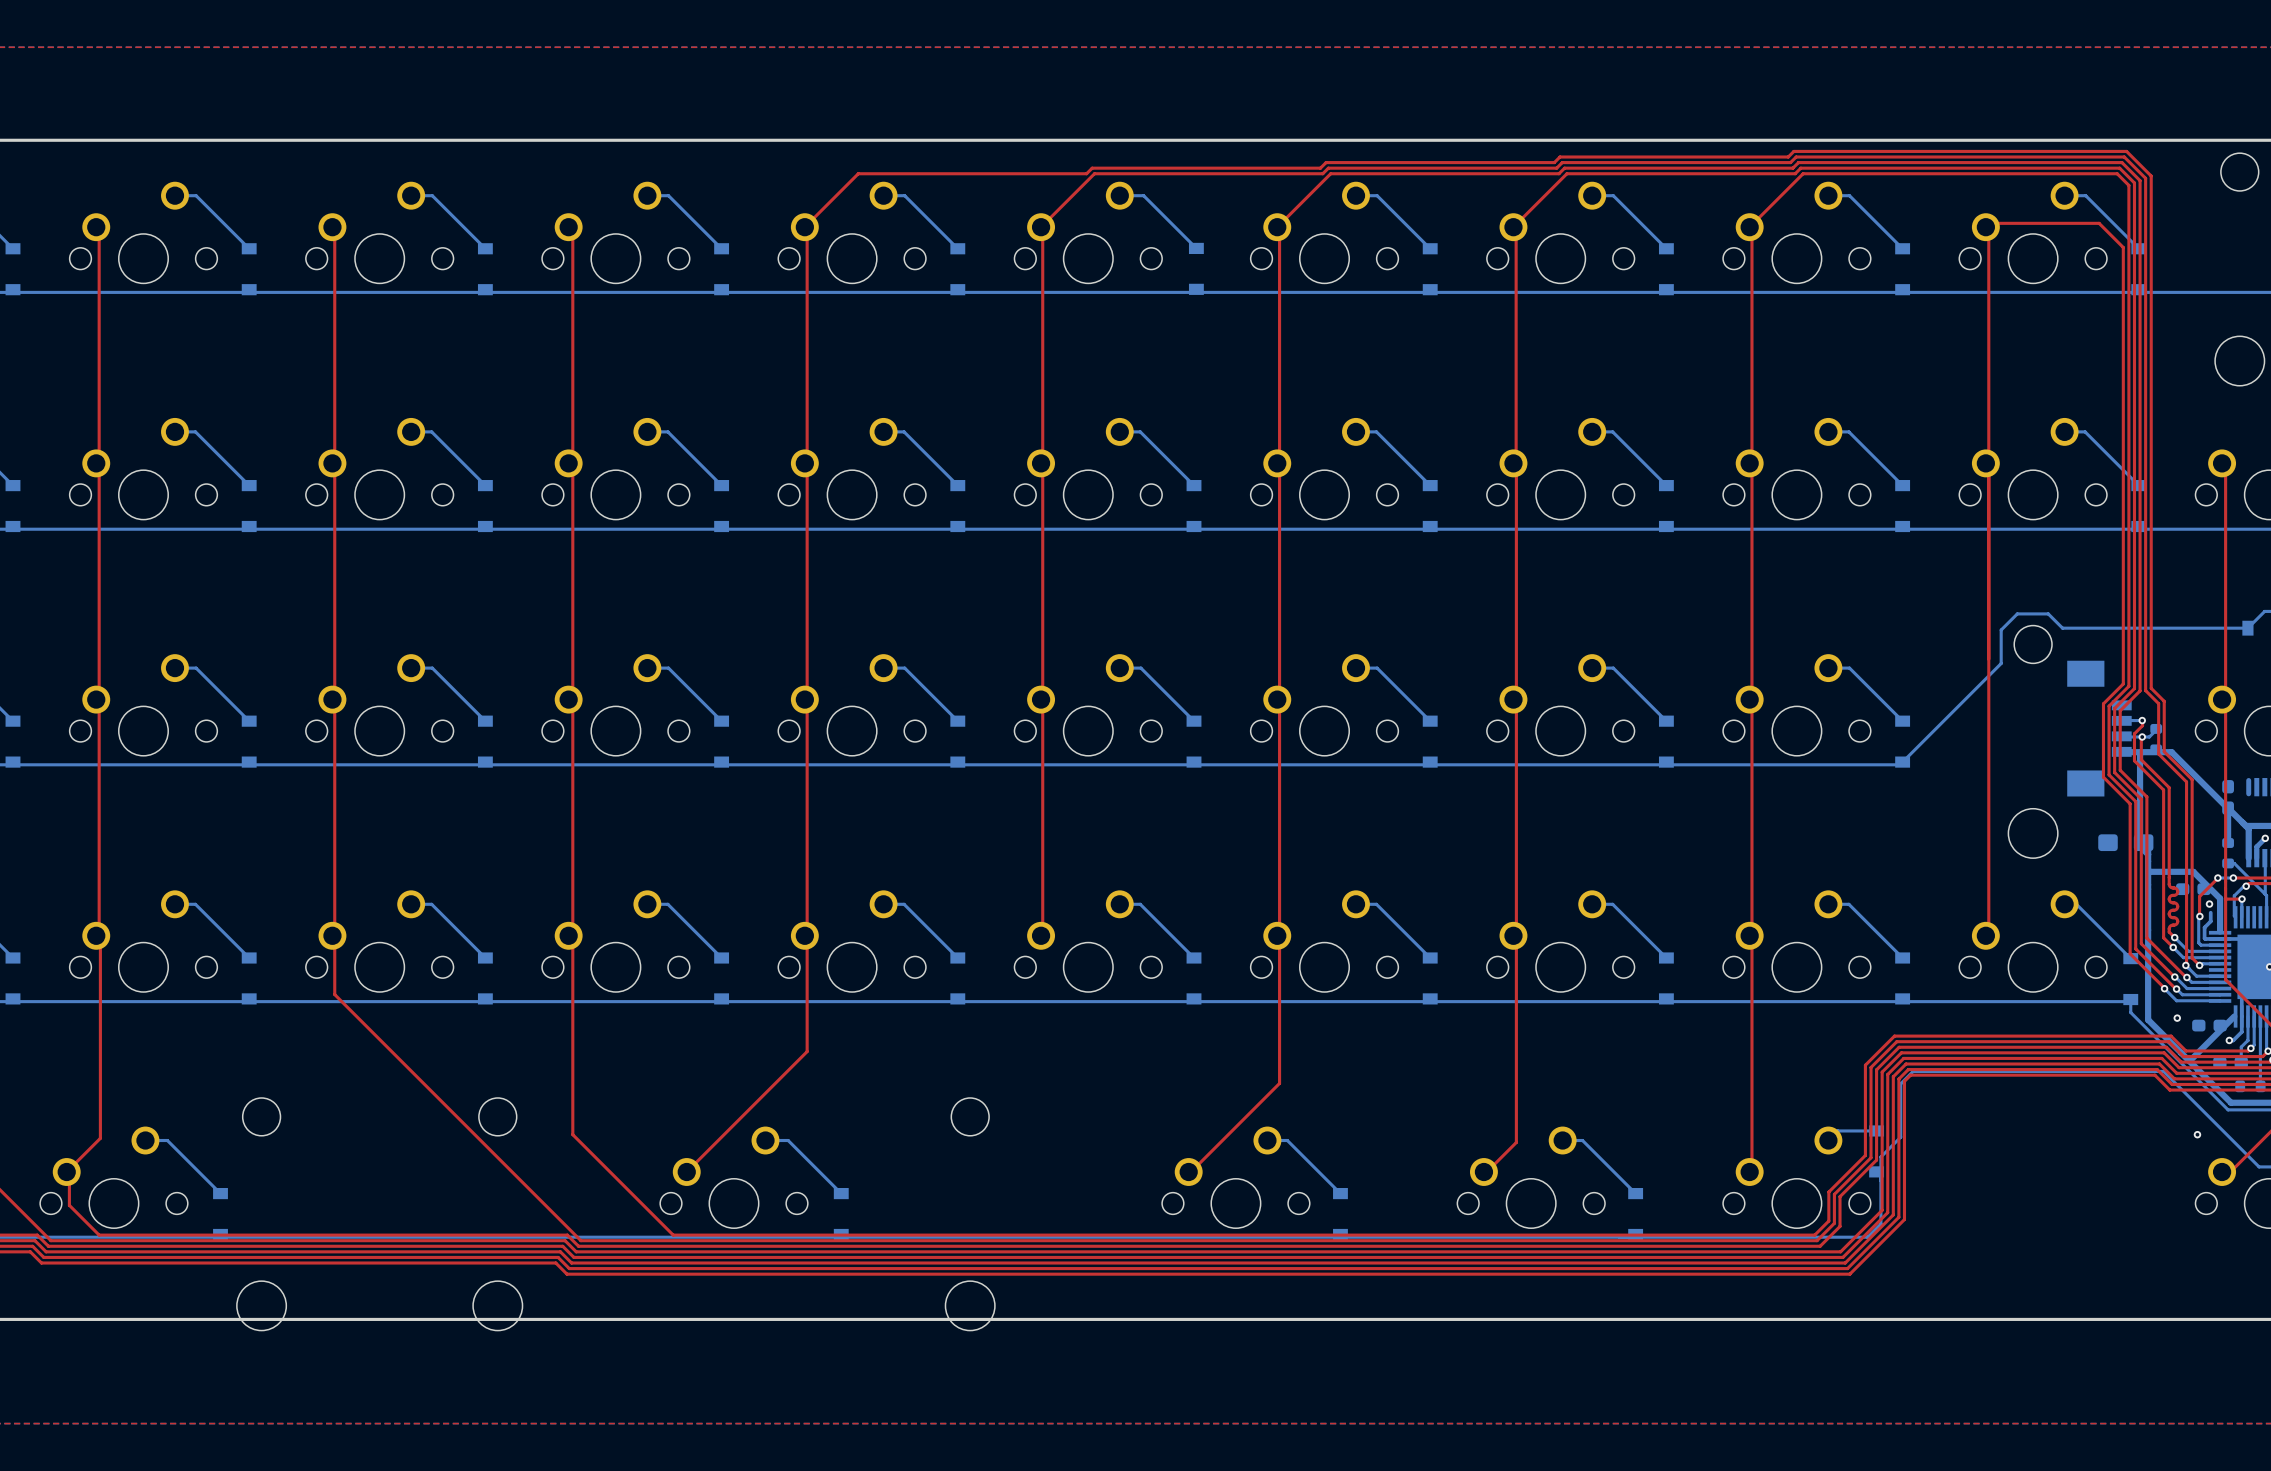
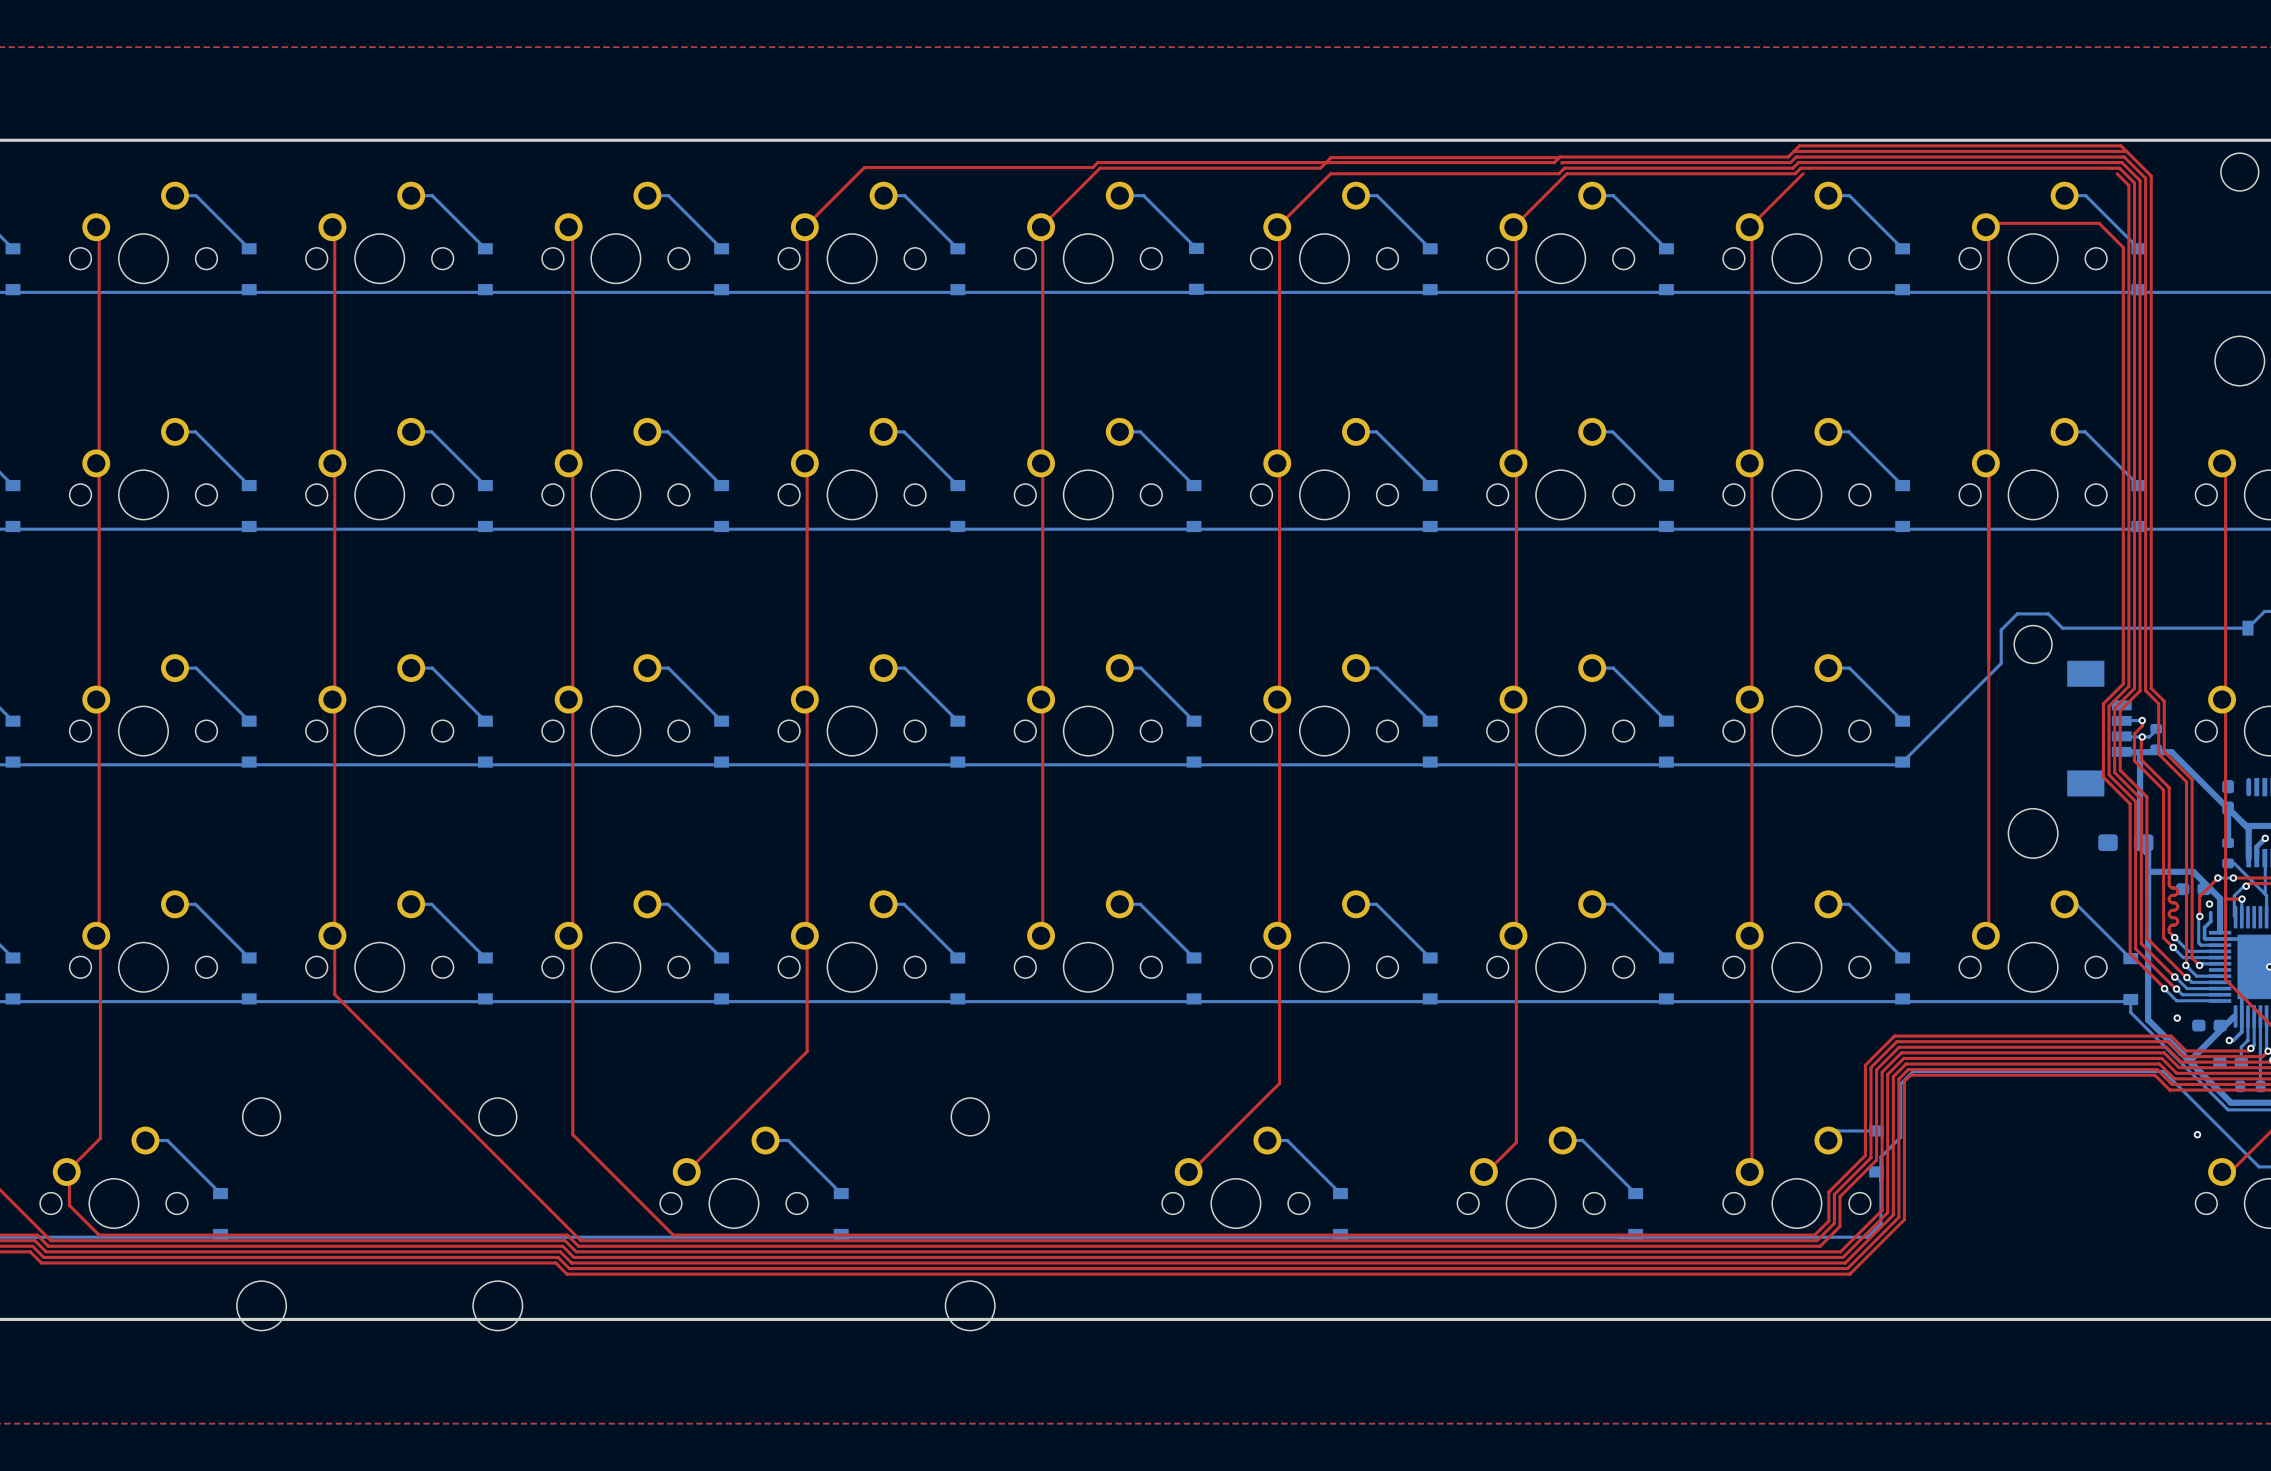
top track: none -> (1793, 151) (1799, 145) (2121, 145) (2126, 151)
top track: none -> (1559, 157) (1331, 157) (1326, 162) (1097, 162) (1092, 167) (864, 167) (858, 173)
top track: (1561, 163) (1556, 168) (1328, 168) (1322, 173) (1094, 173) -> none
top track: (1100, 168) (1092, 168) (1086, 173) (858, 173) -> (1100, 168) (1094, 173)
top track: (1803, 173) (2117, 173) -> none

